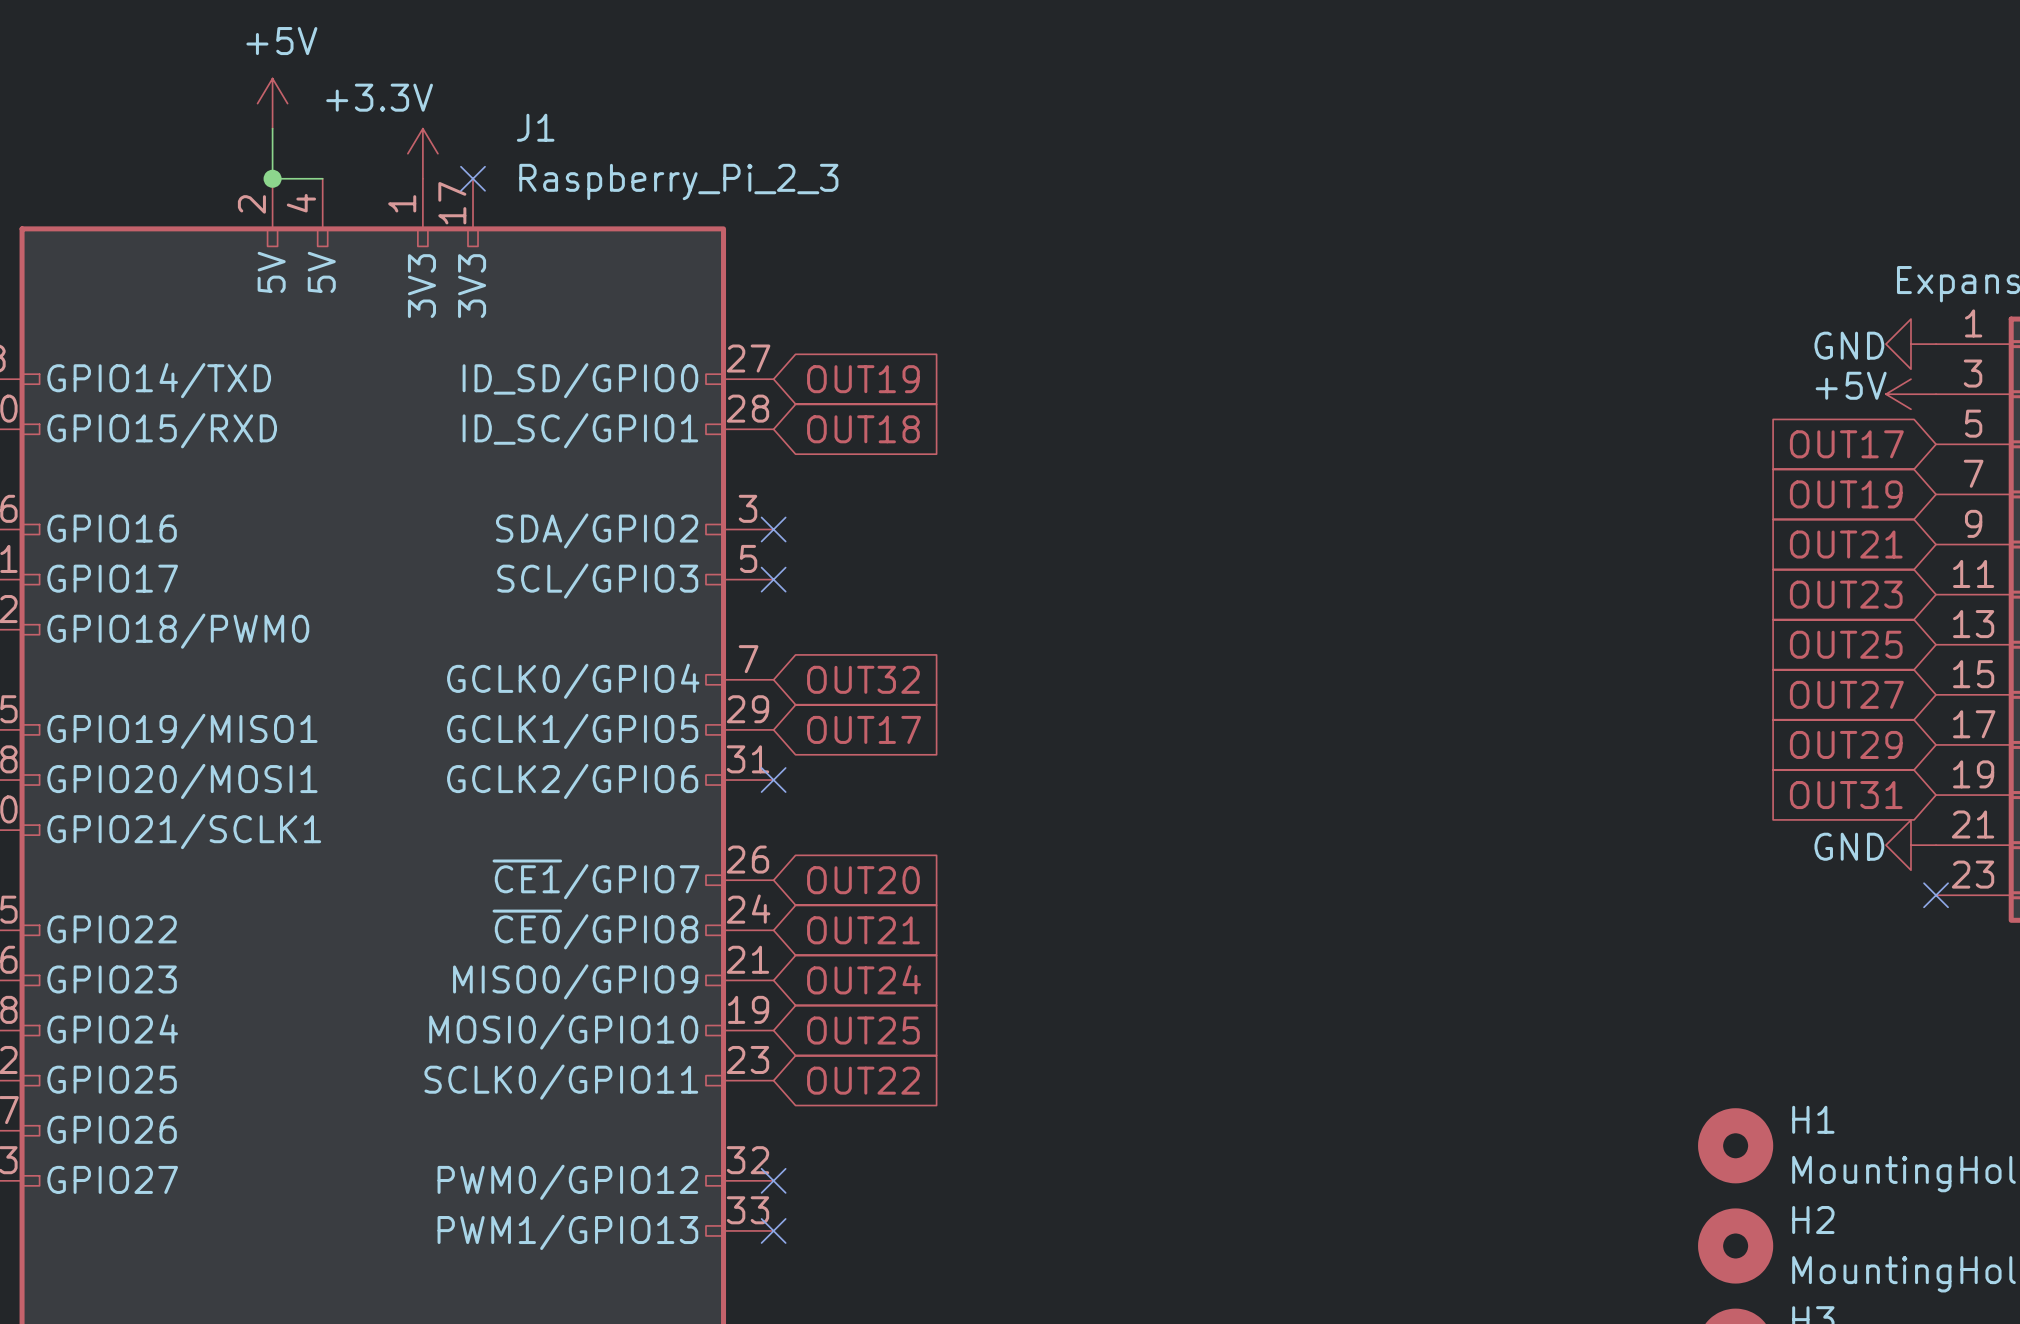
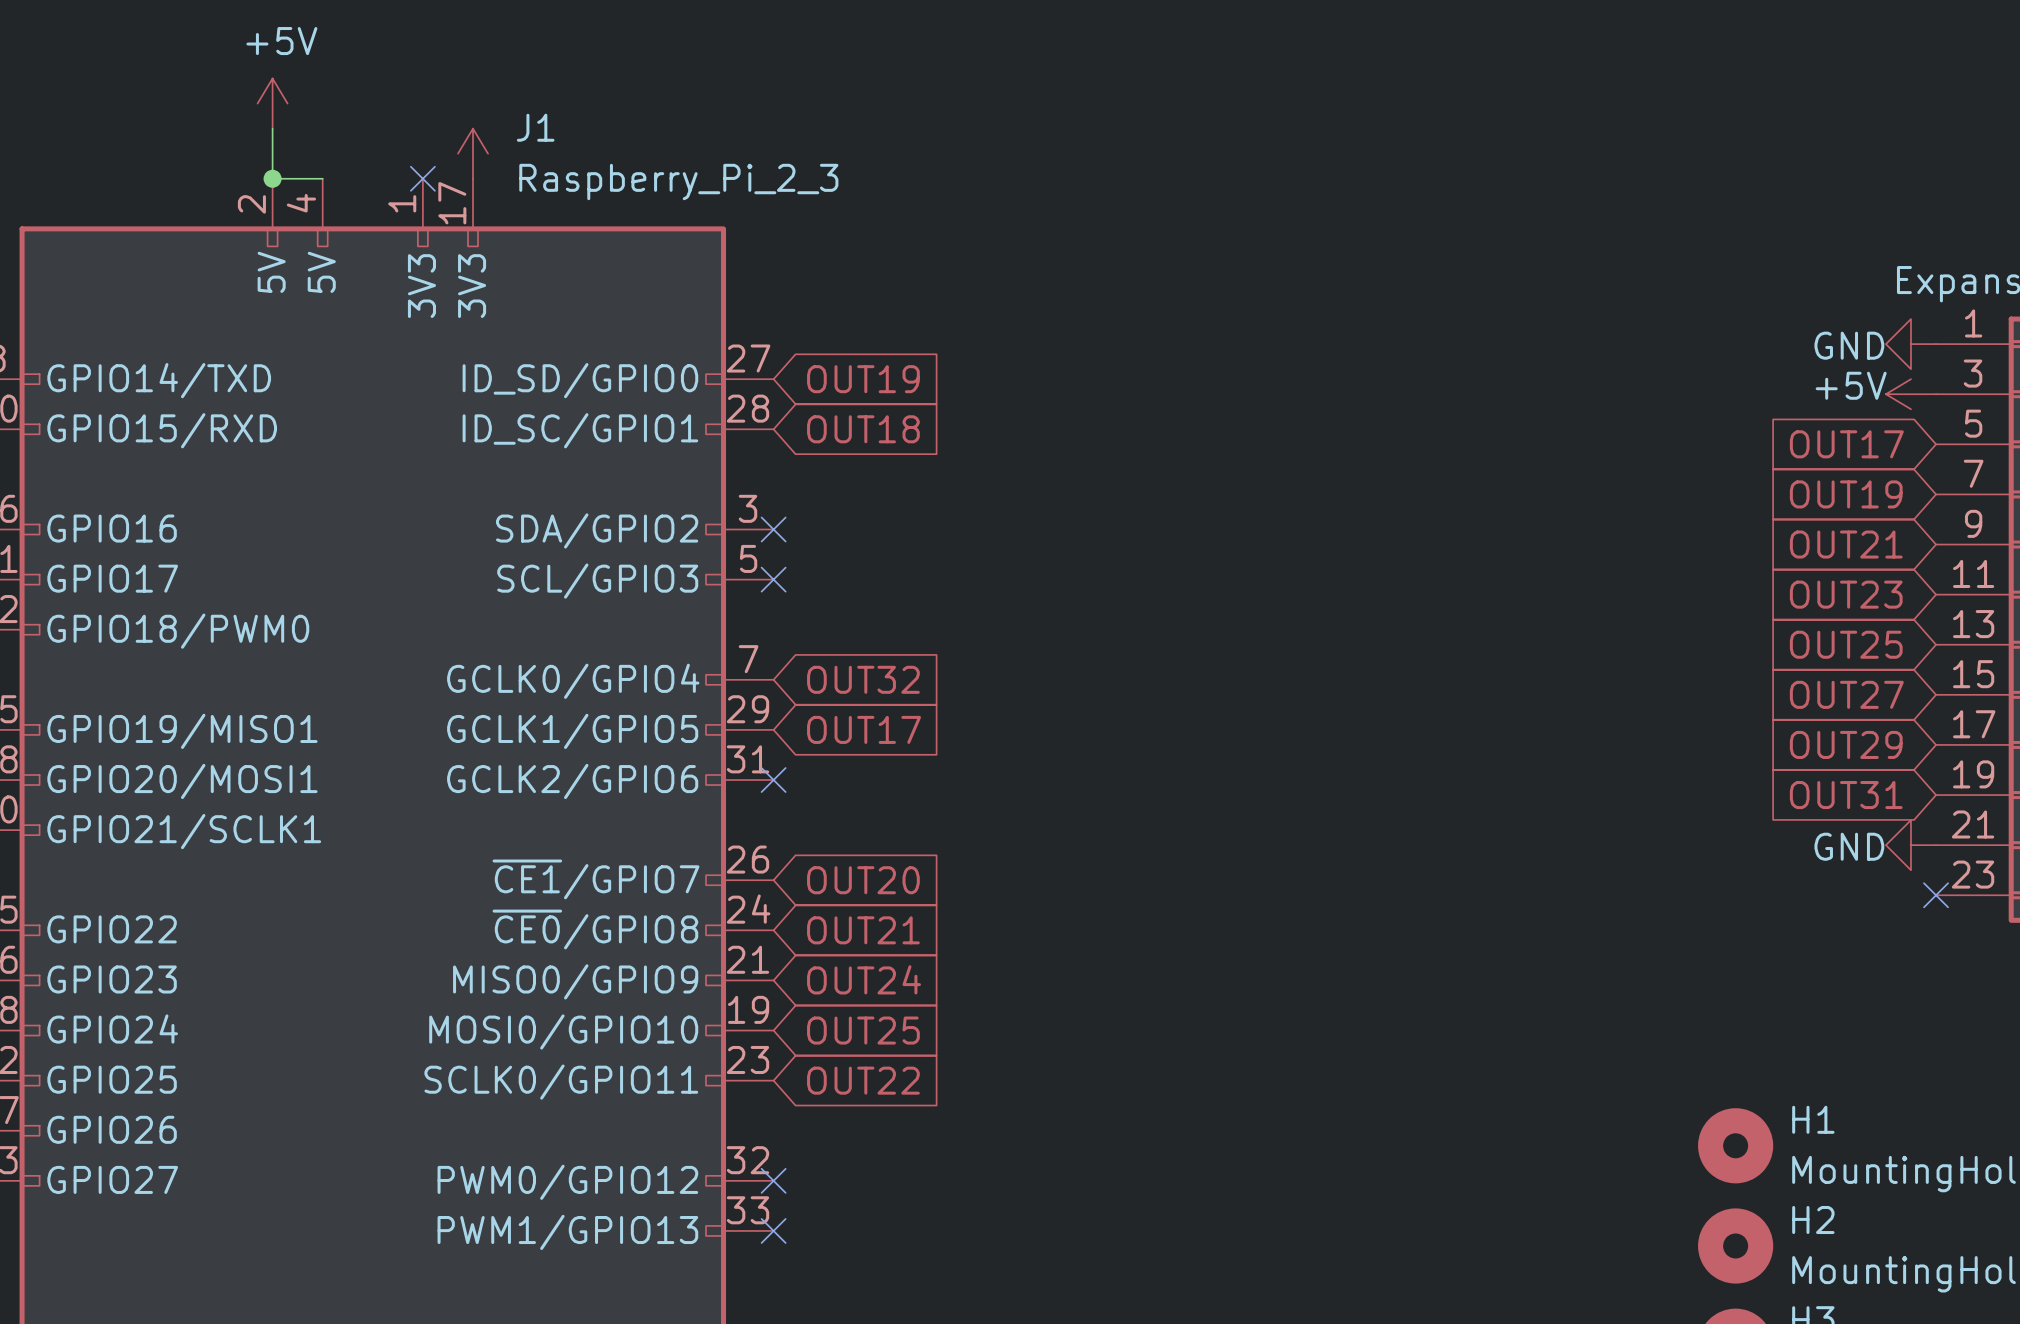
power symbol: +3.3V (422, 153) -> none
power symbol: none -> (473, 153)
no-connect mark position: (473, 178) -> (422, 178)

